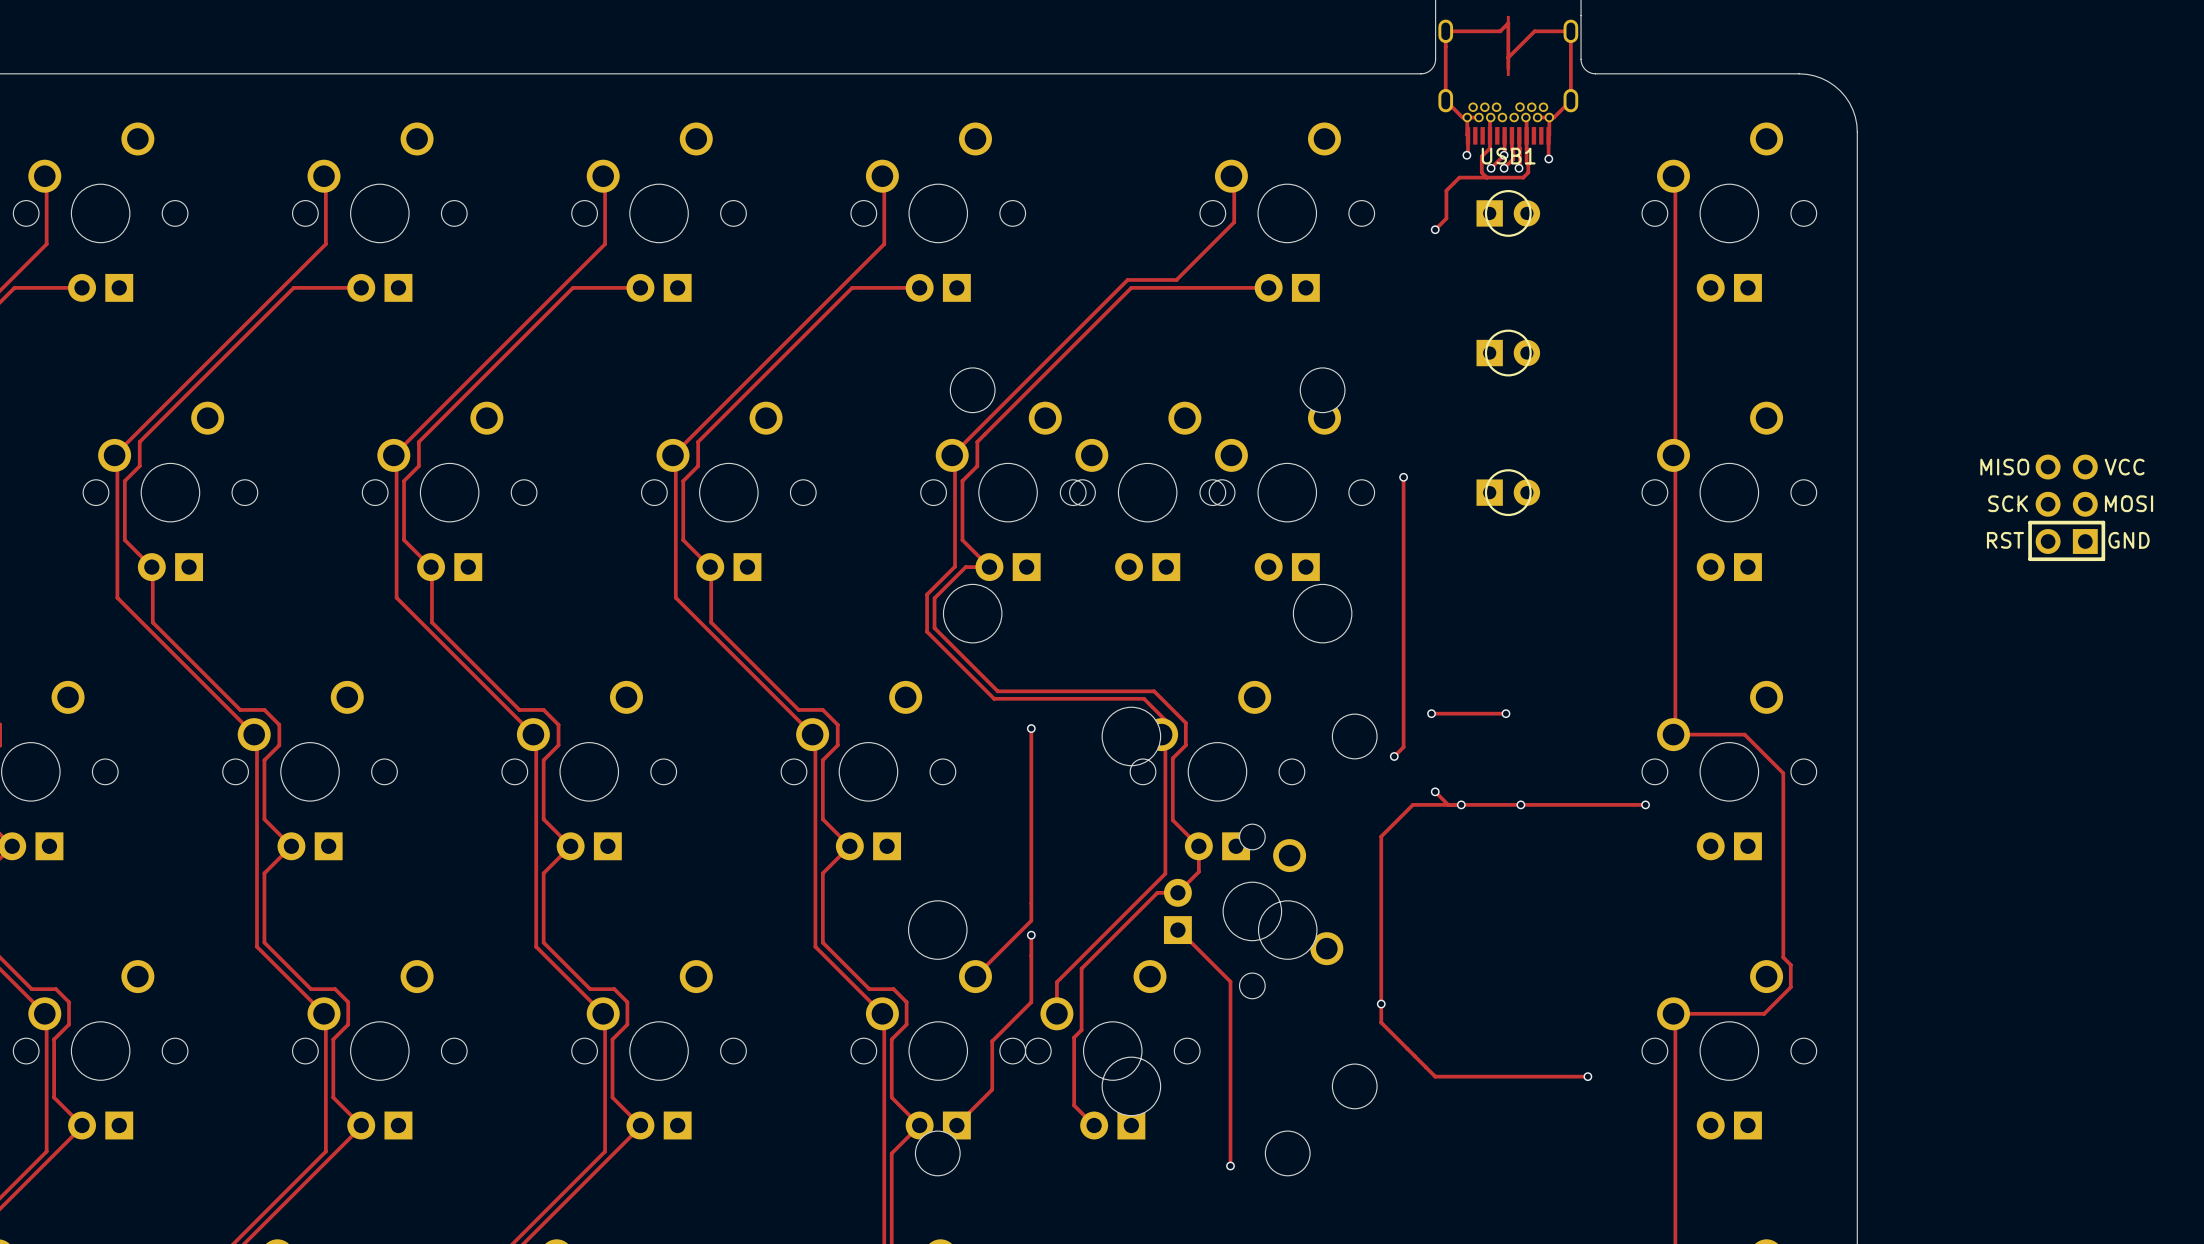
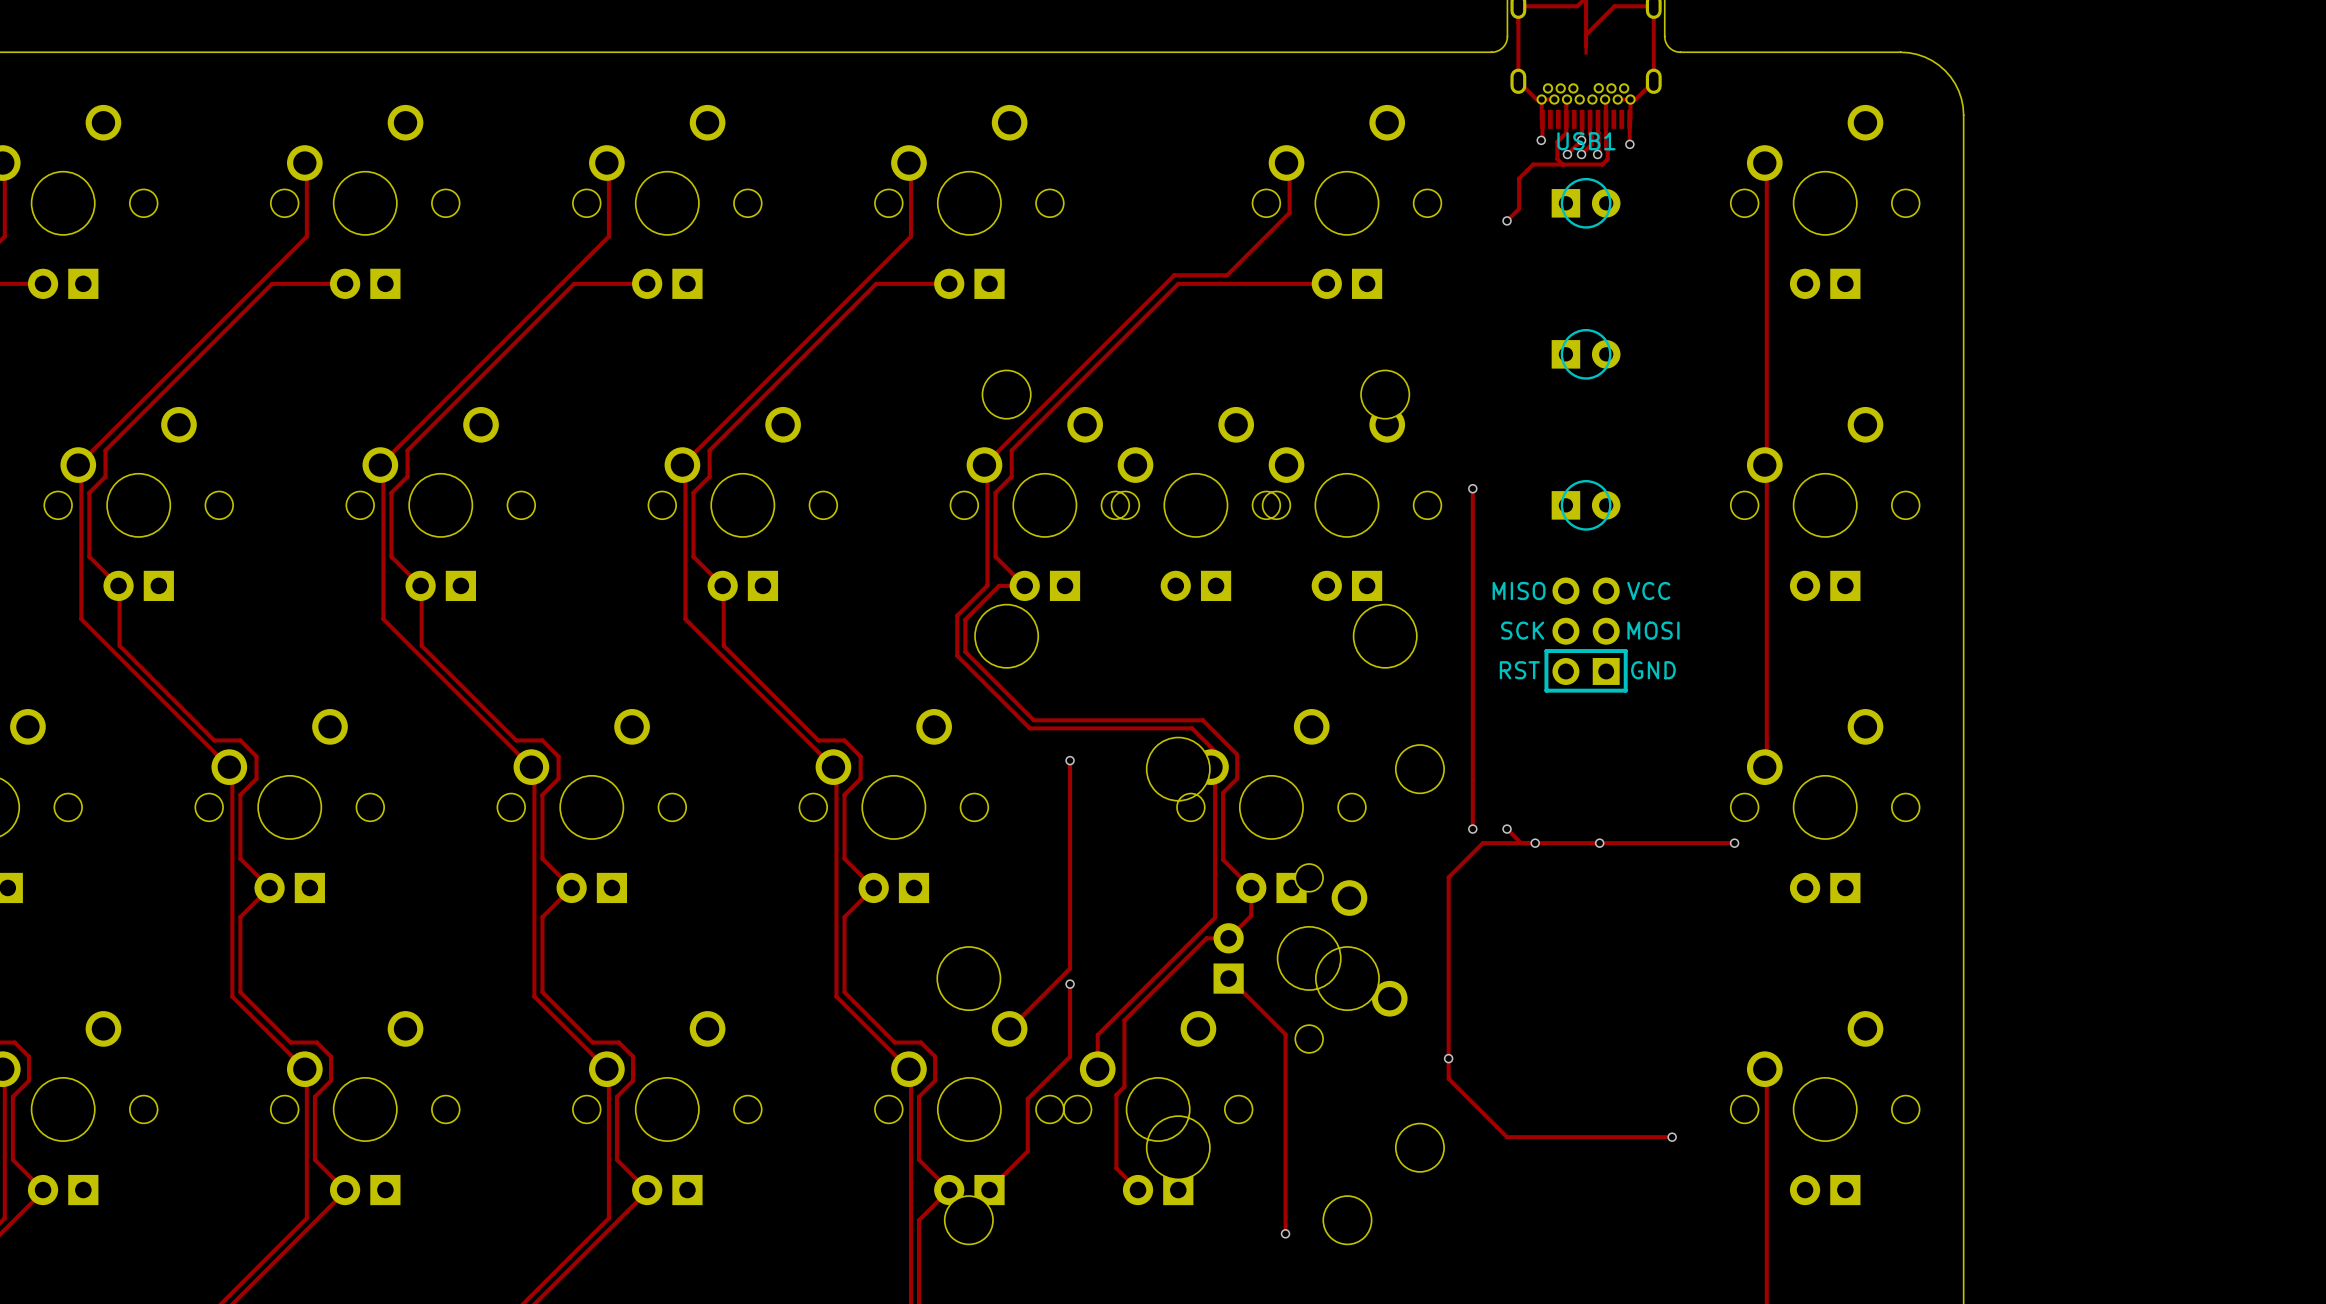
part: (2066, 507) -> none
part: none -> (1586, 635)
track: (1431, 713) (1505, 713) -> none
via: (1431, 713) -> none
via: (1505, 713) -> none
track: (1673, 734) (1744, 734) (1783, 773) (1783, 957) (1790, 964) (1790, 987) (1764, 1013) (1673, 1013) -> none
track: (1403, 747) (1394, 756) -> (1472, 780) (1472, 829)
via position: (1394, 756) -> (1472, 829)

